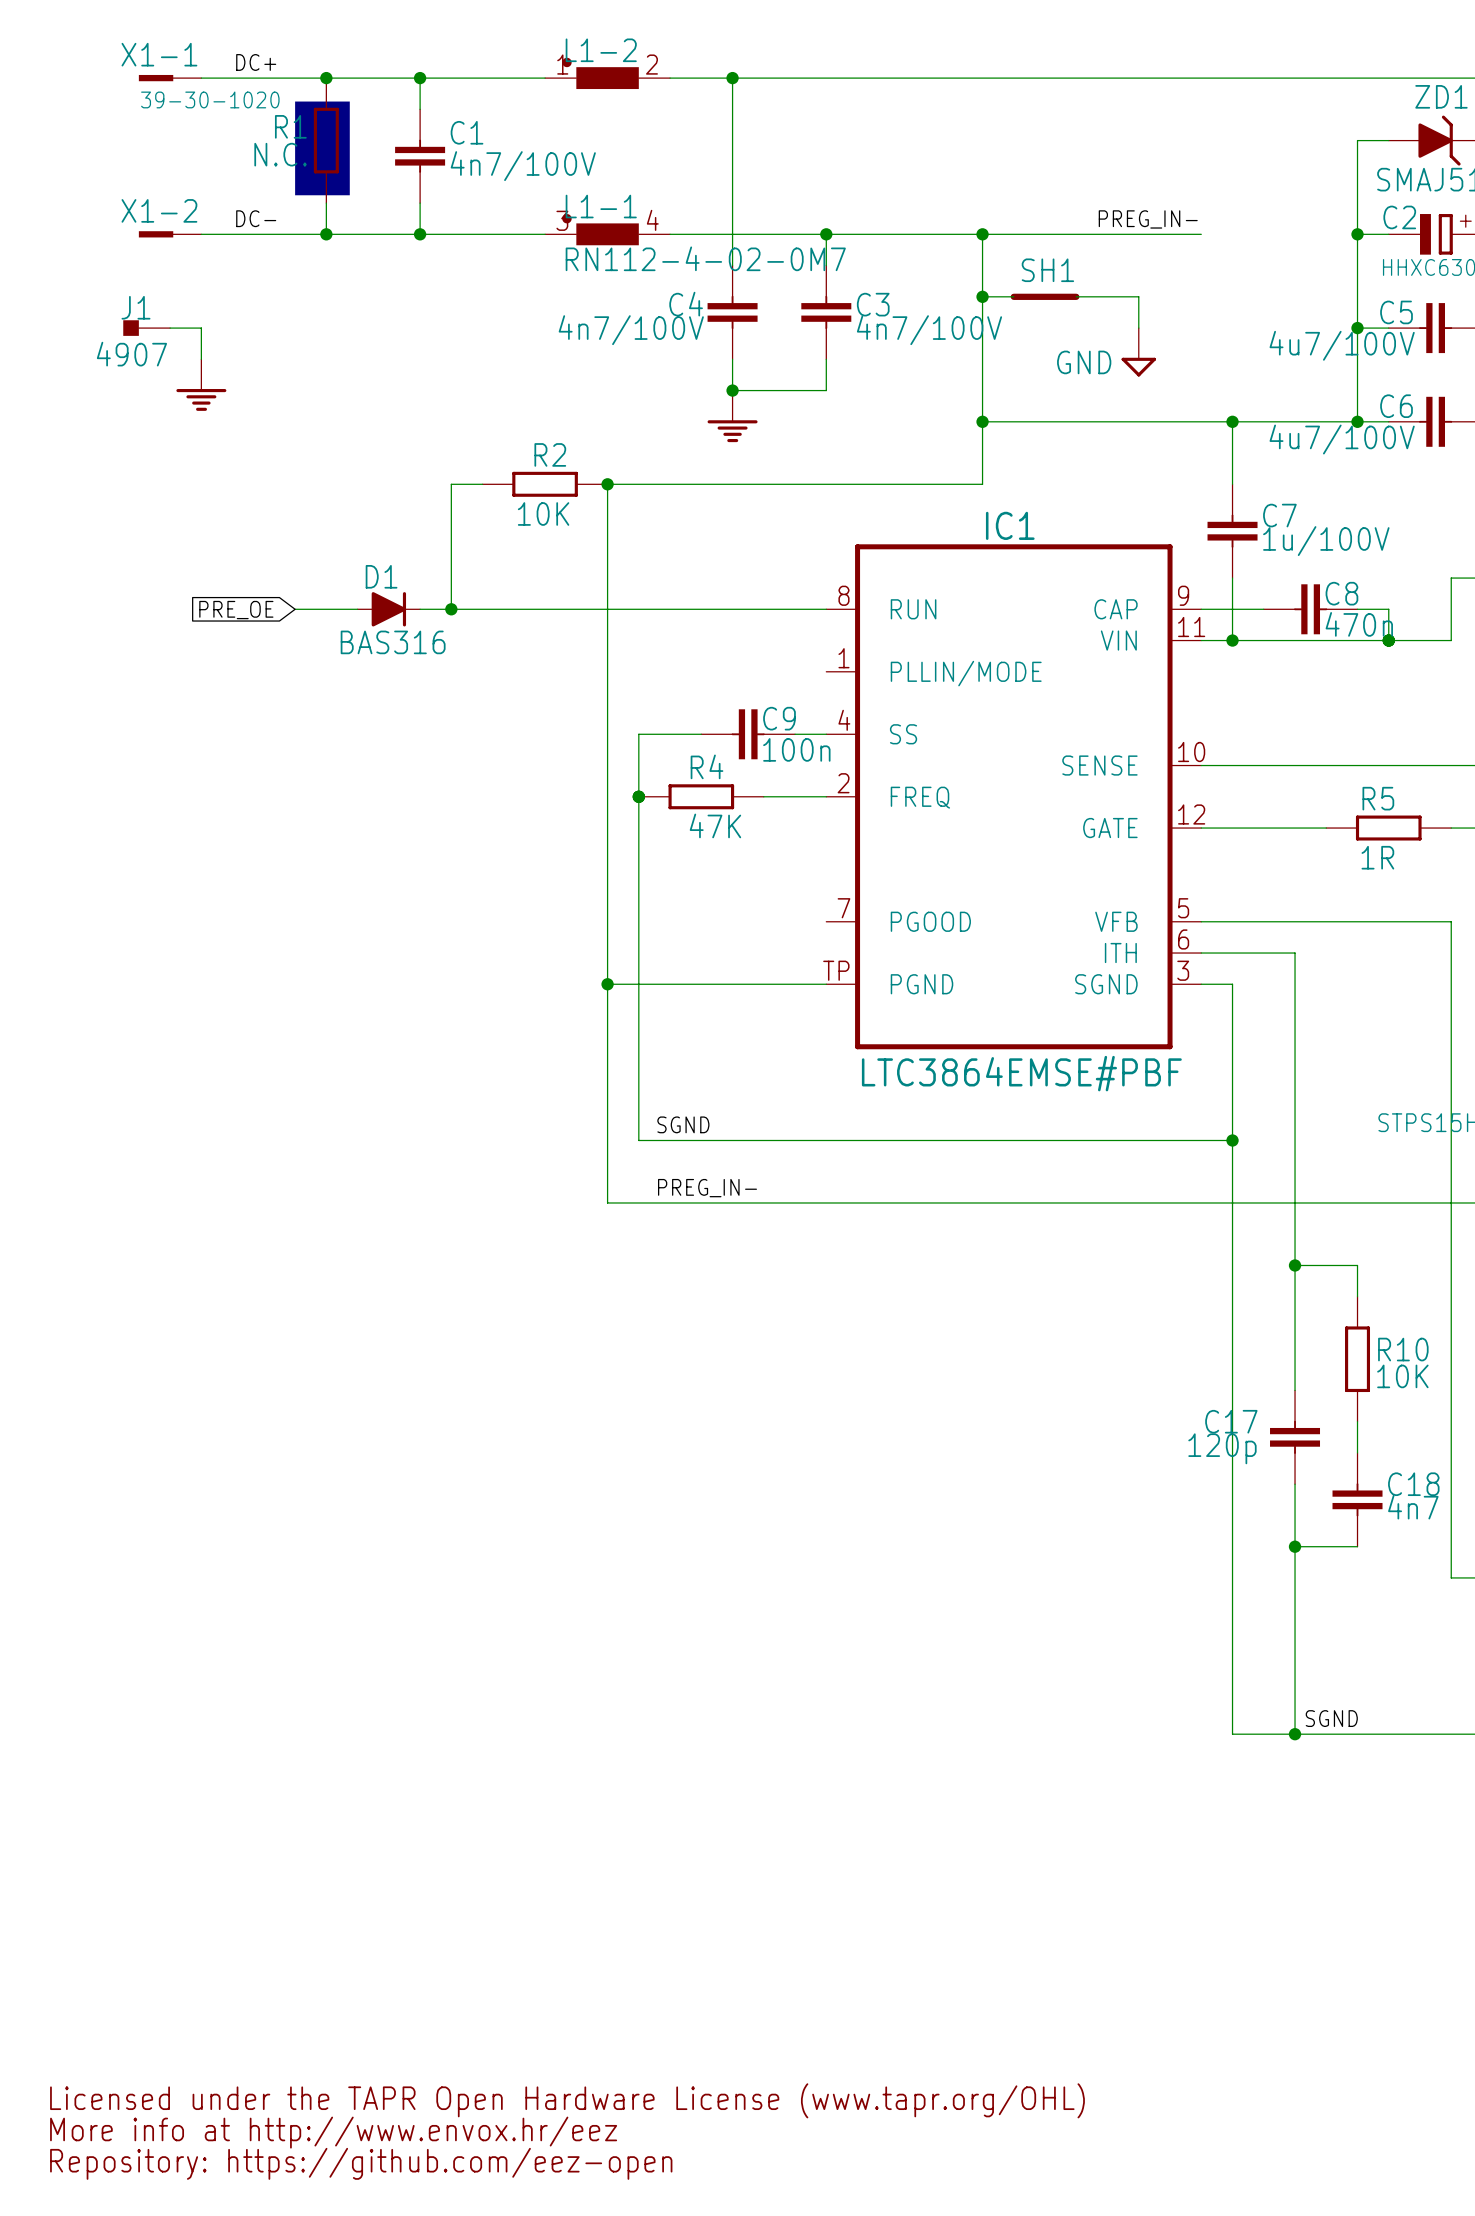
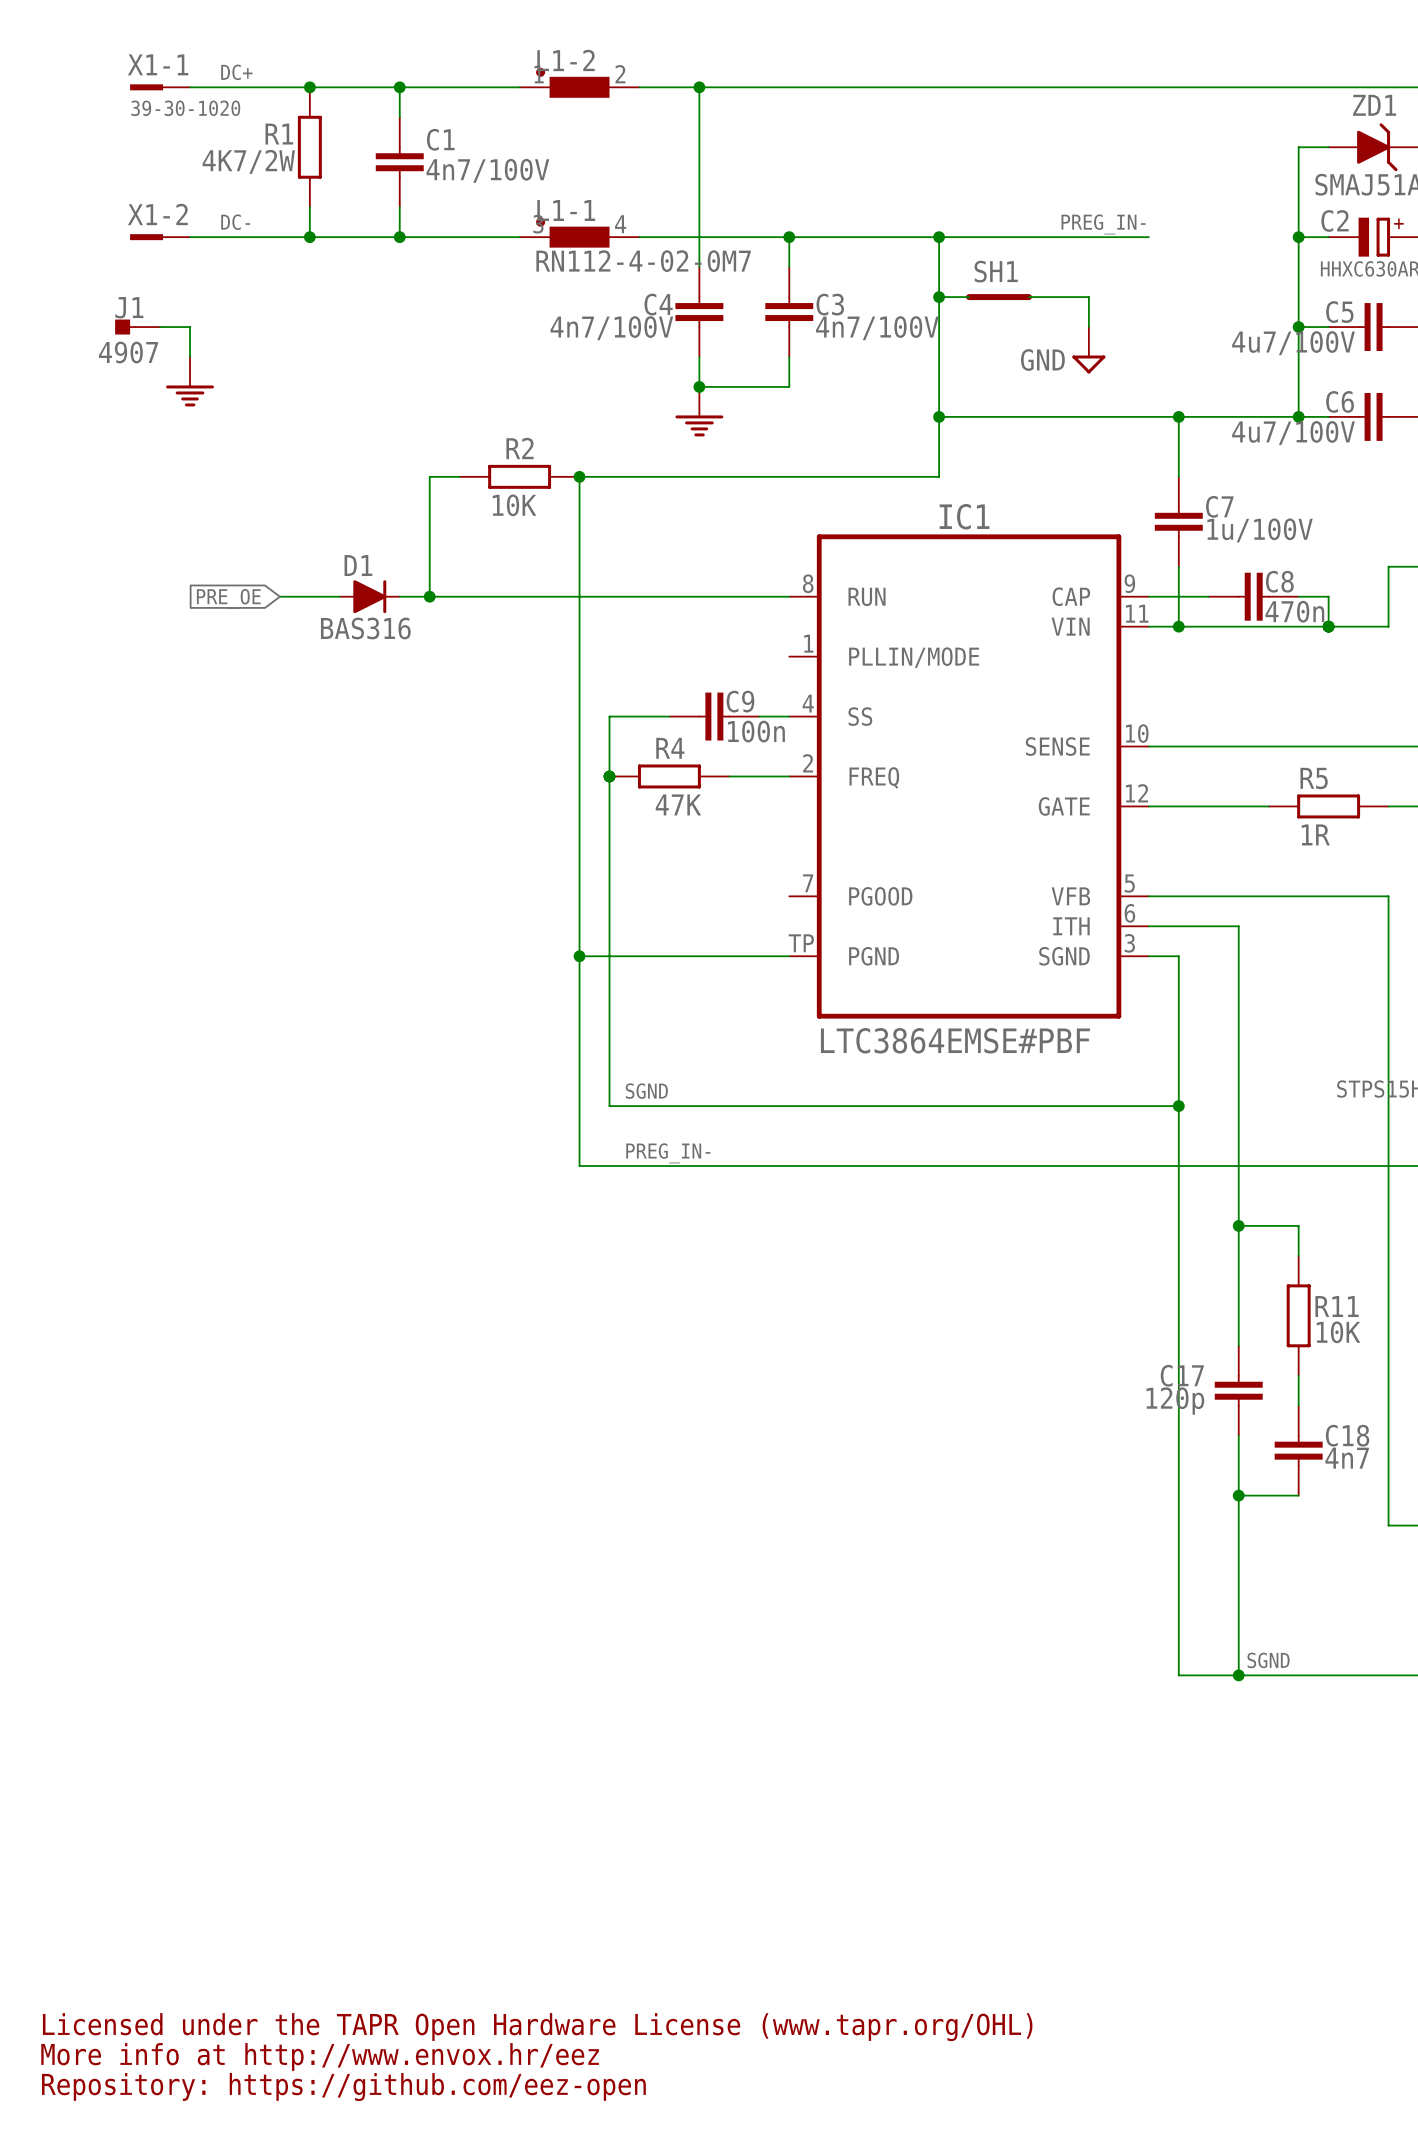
drawing: [295, 101, 350, 196] -> none
R1 value: N.C. (280, 154) -> 4K7/2W (248, 161)
R10 name: R10 (1403, 1349) -> R11 (1337, 1306)

